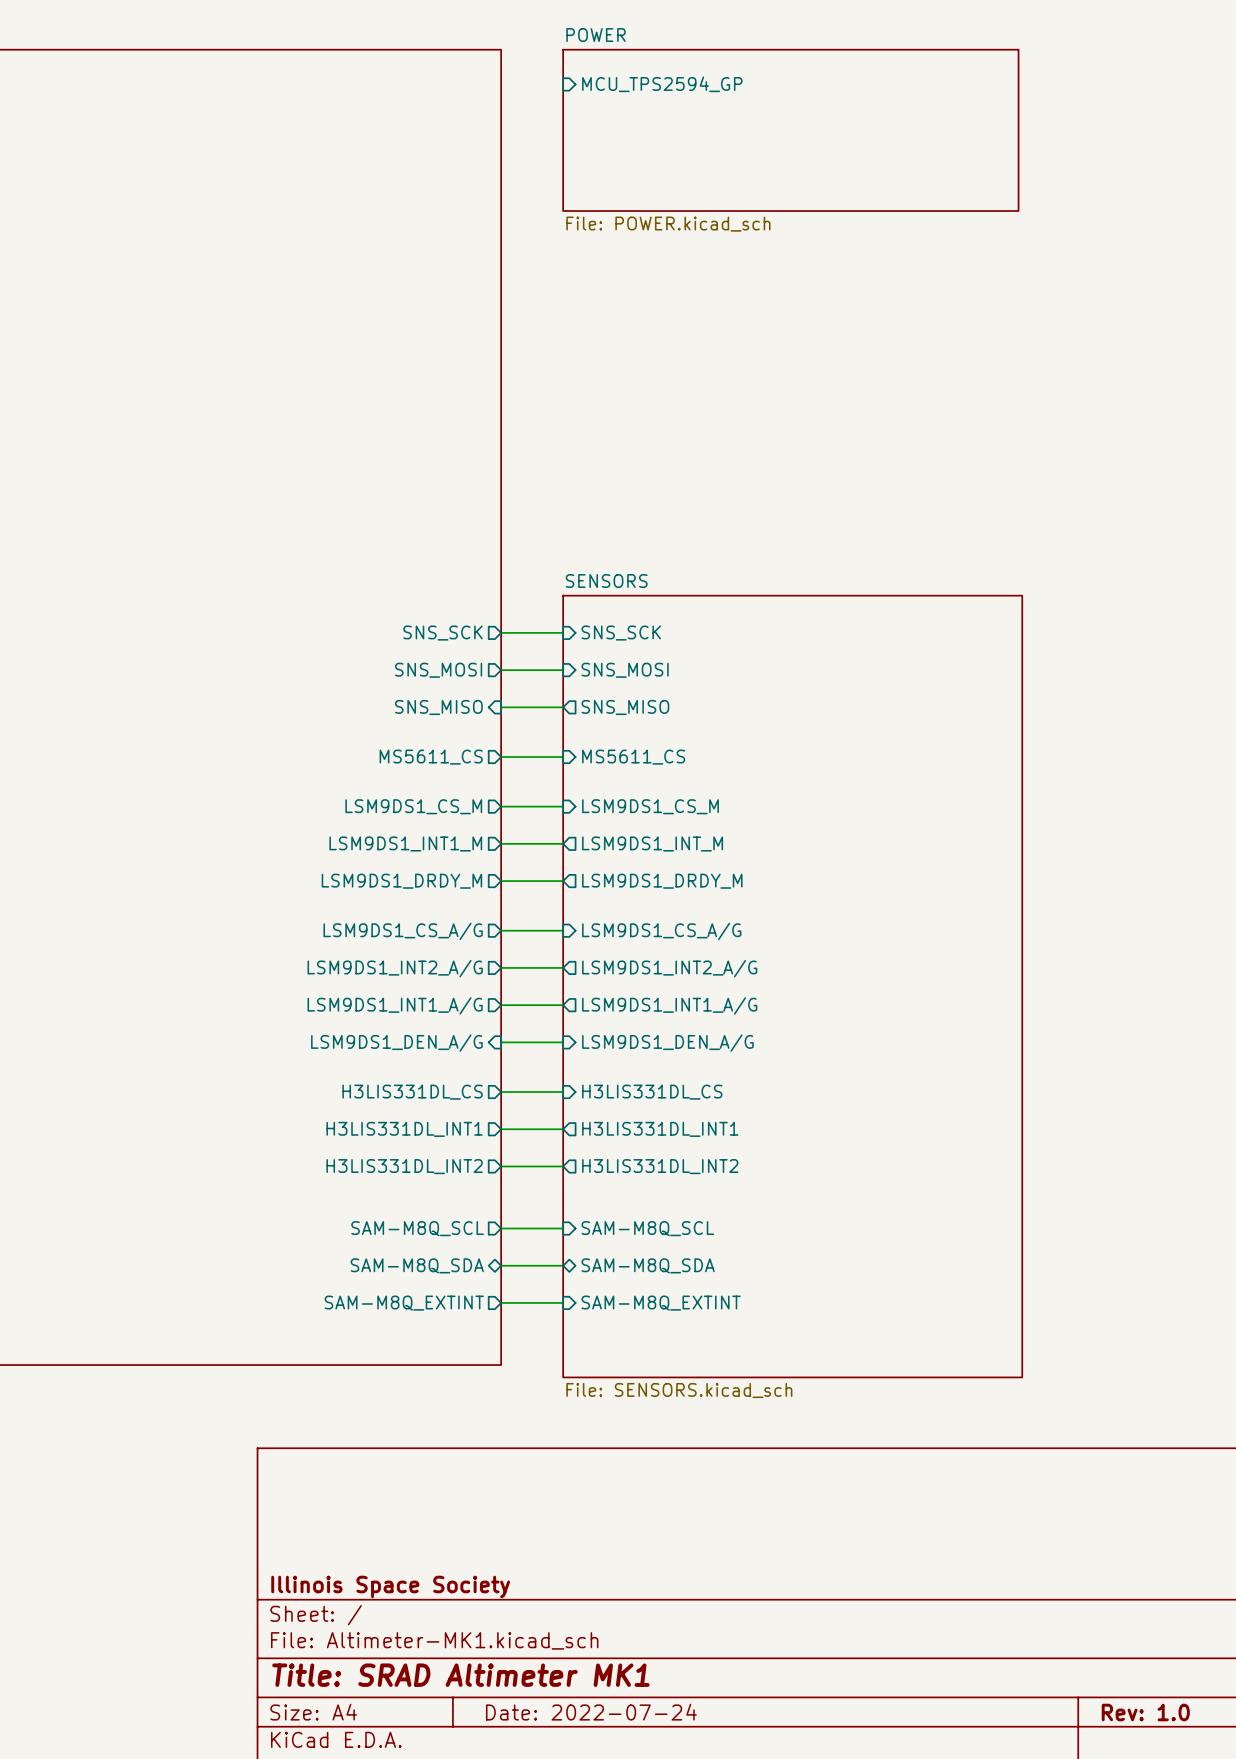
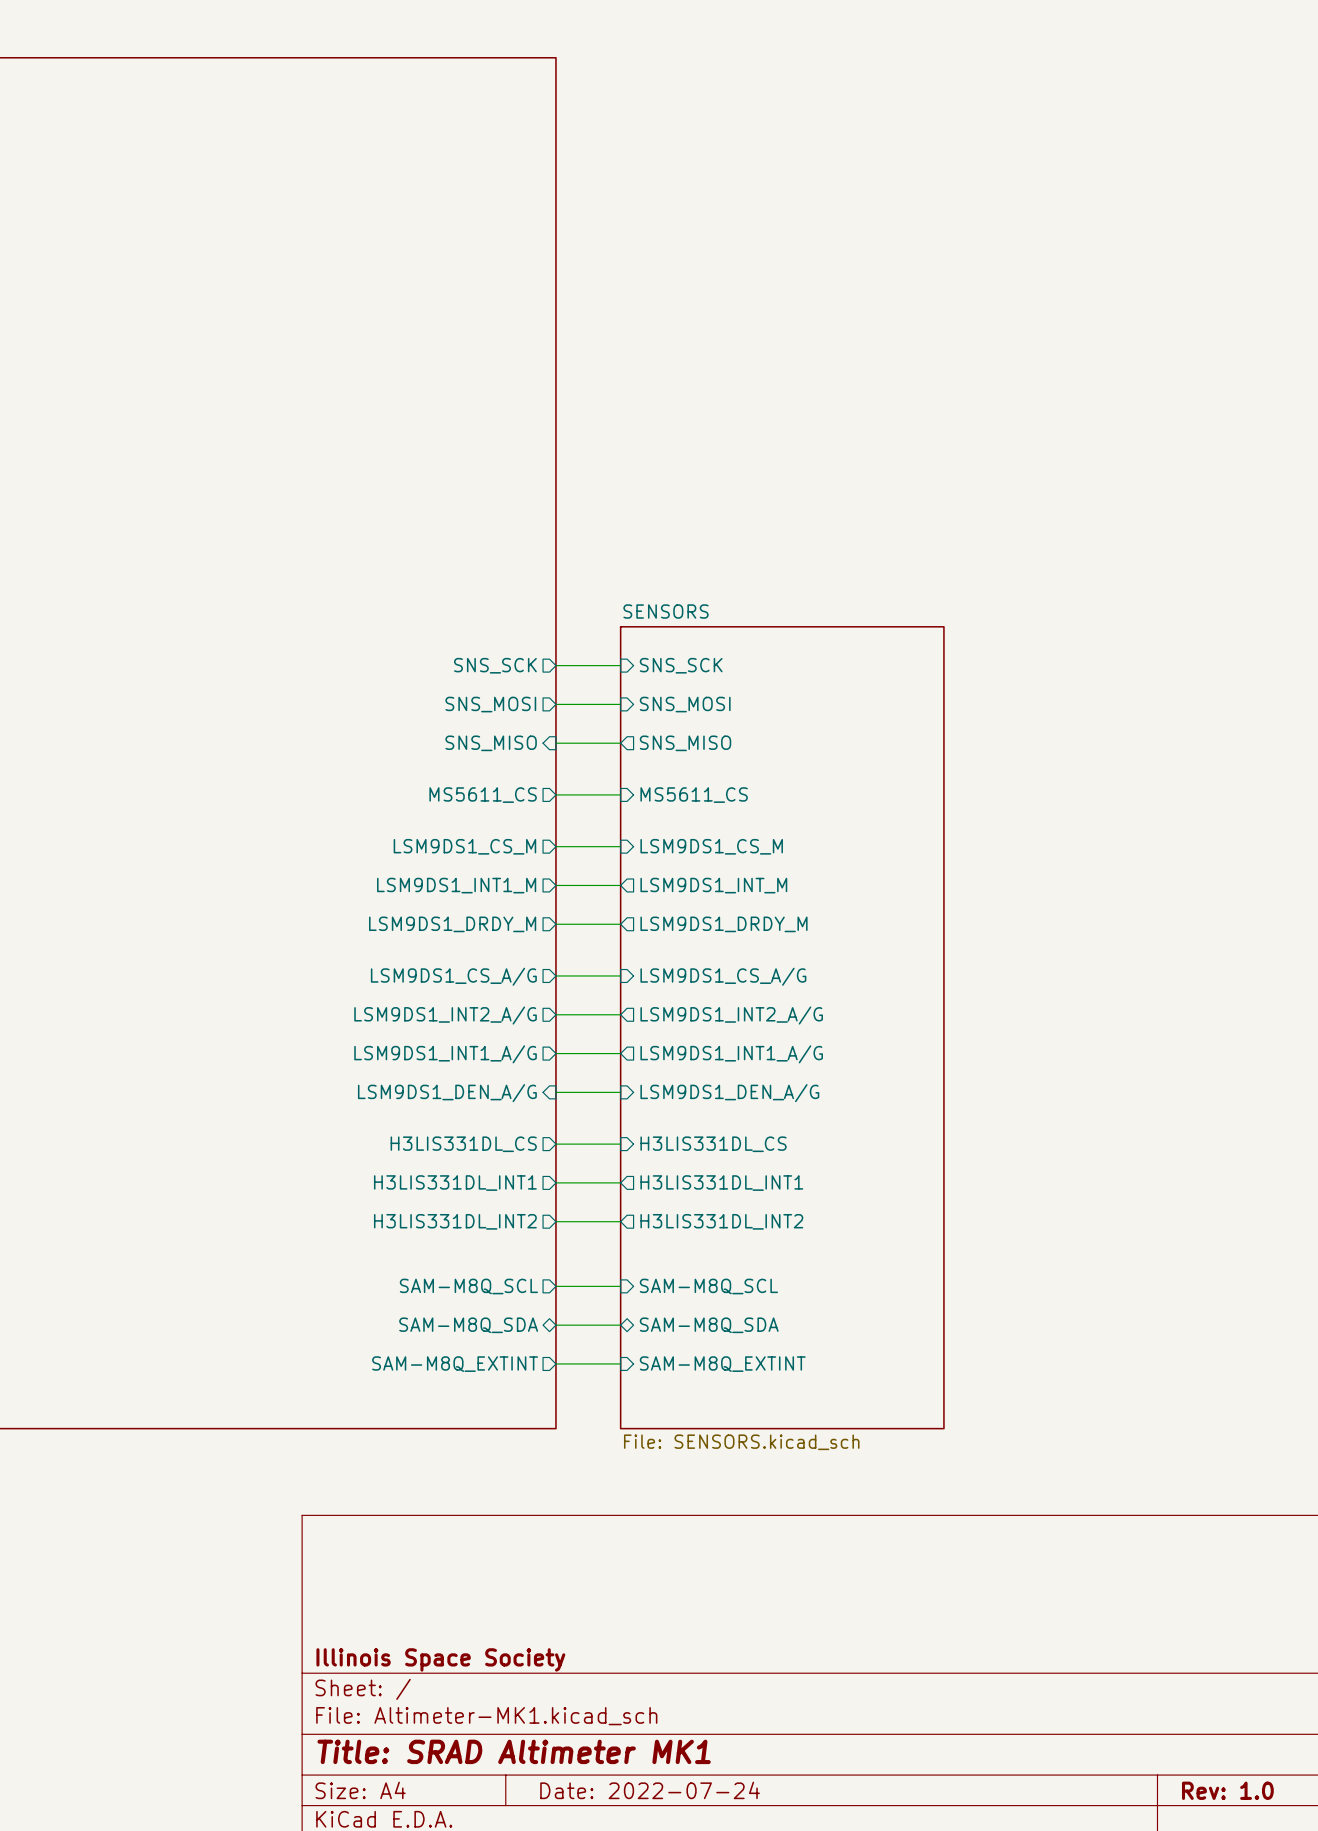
sheet pin: MCU_TPS2594_GP (662, 84) -> none
sheet POWER: File: POWER.kicad_sch (790, 130) -> none
sheet SENSORS: none -> File: SENSORS.kicad_sch (782, 1027)
sheet SENSORS: File: SENSORS.kicad_sch (792, 986) -> none

